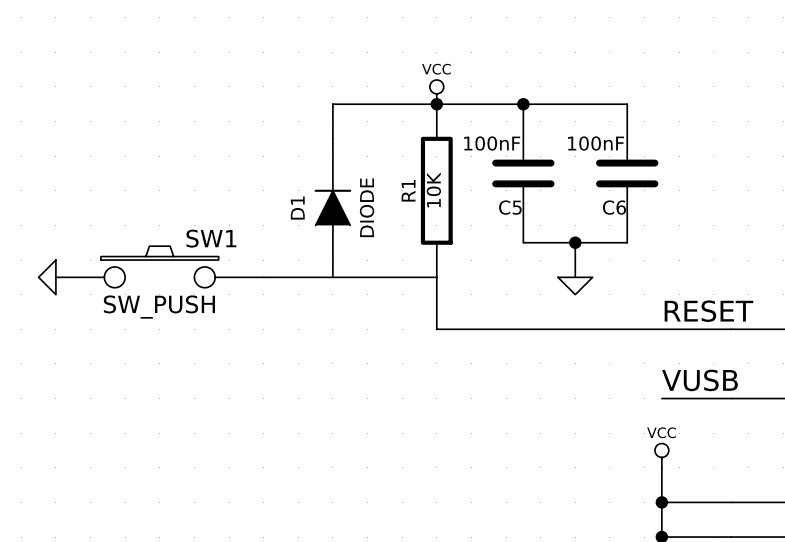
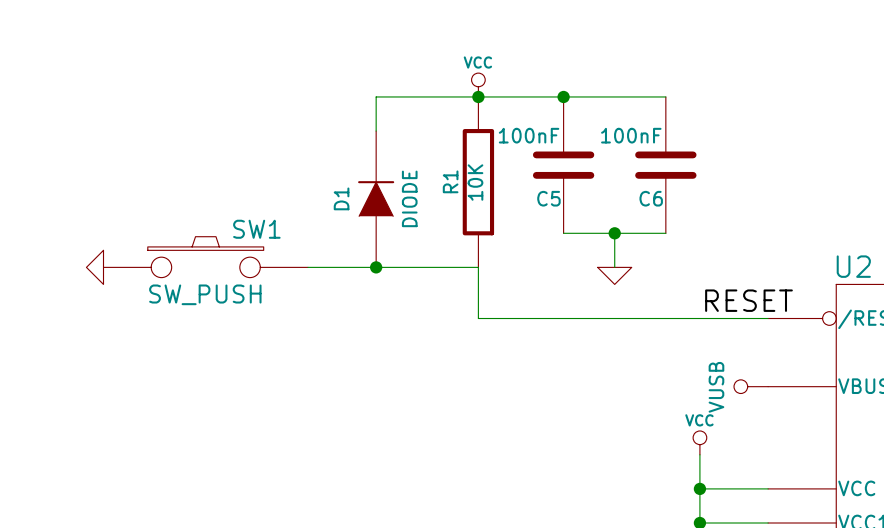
junction: none -> (376, 267)
label: VUSB (699, 380) -> none
wire: (661, 398) (731, 398) -> none
power symbol: none -> VUSB (751, 386)

